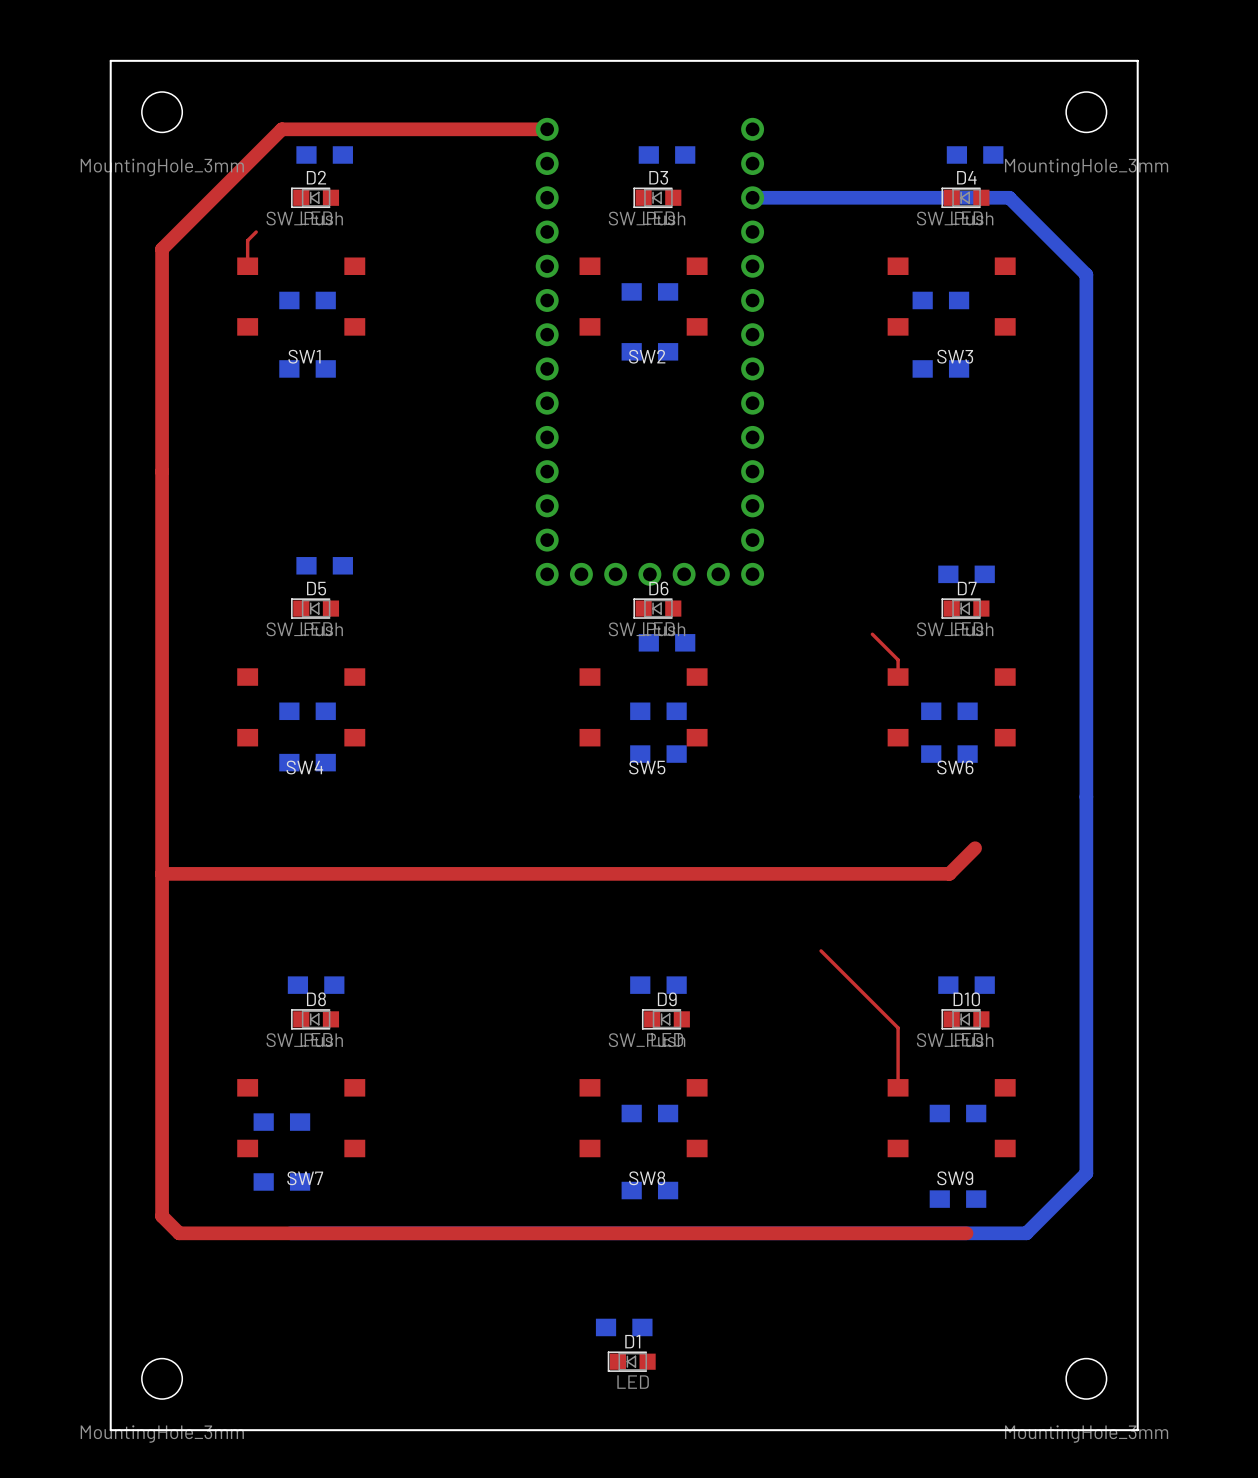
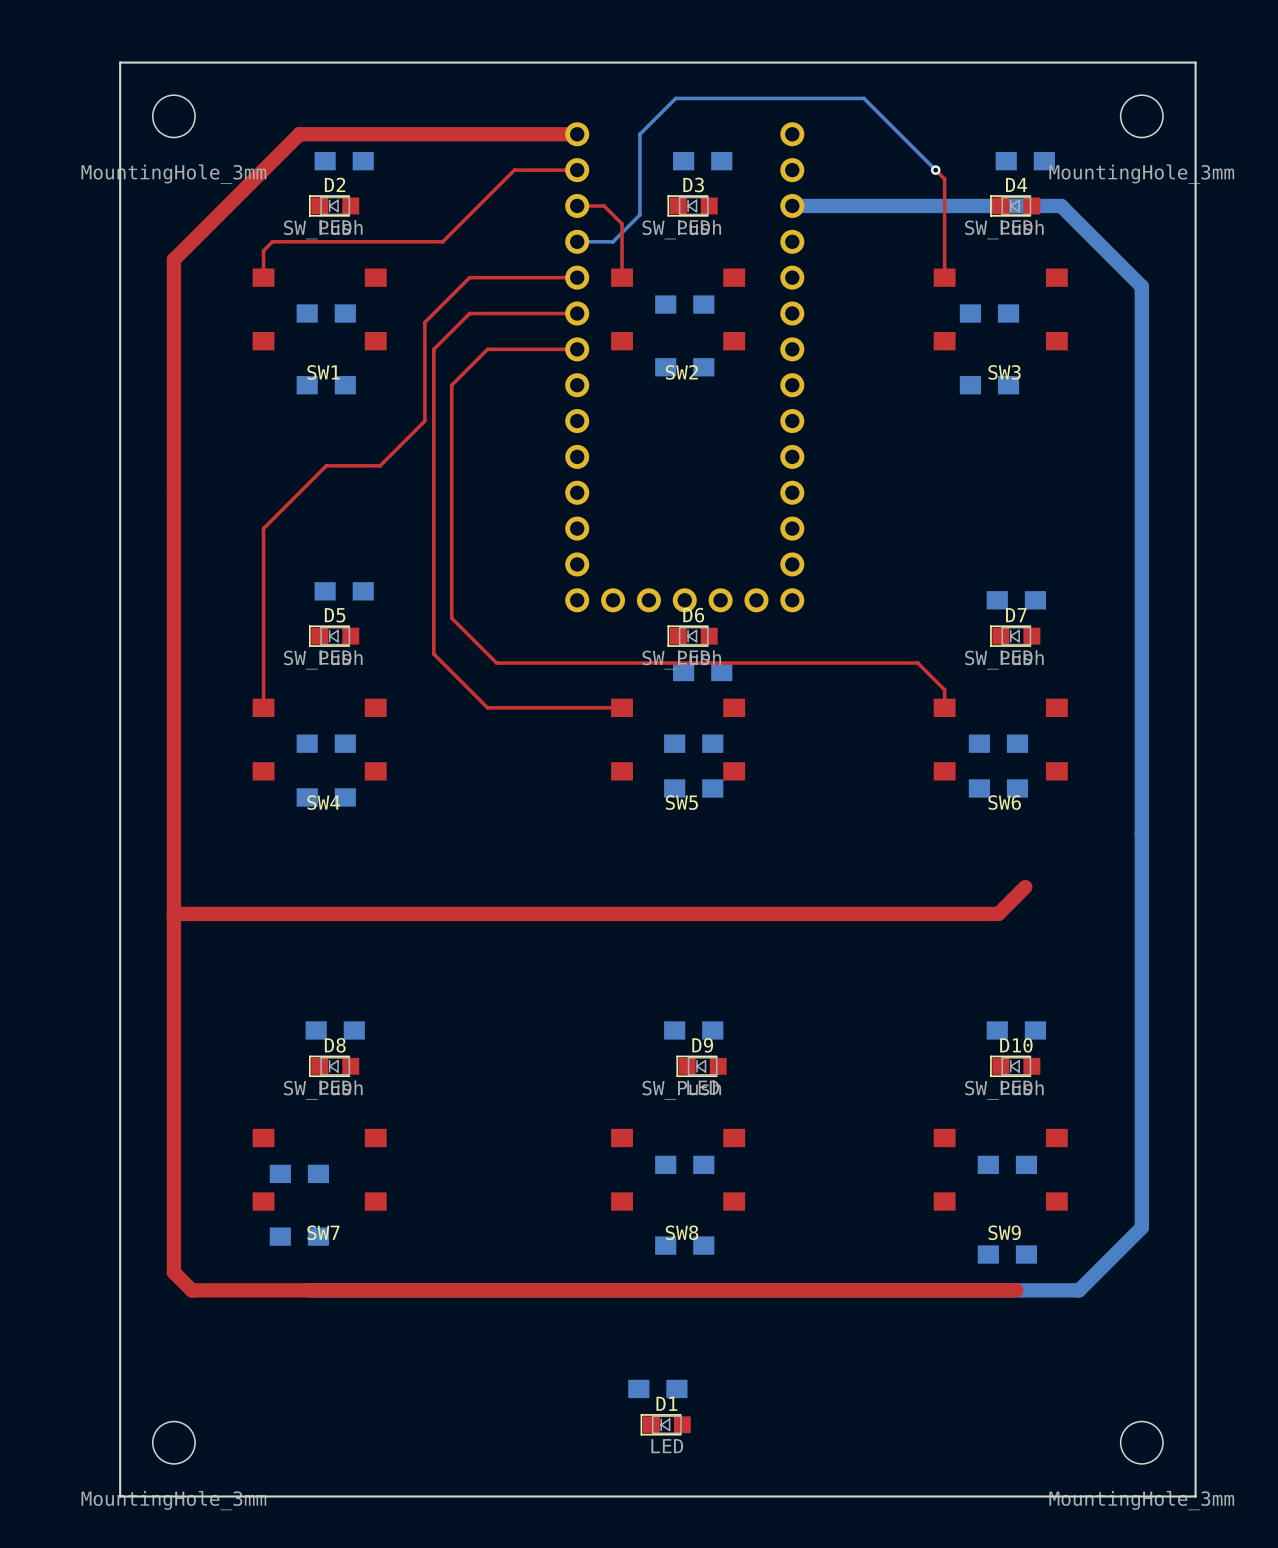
top track: none -> (577, 170) (514, 170) (442, 241) (272, 241)
bottom track: none -> (935, 170) (863, 98) (675, 98) (639, 134) (639, 214) (613, 241) (577, 241)
top track: none -> (935, 170) (944, 179) (944, 277)
via: none -> (935, 170)
top track: none -> (577, 205) (604, 205) (622, 223) (622, 277)
top track: none -> (577, 277) (469, 277) (424, 322) (424, 421) (380, 465) (326, 465) (263, 528) (263, 707)
top track: none -> (577, 313) (469, 313) (433, 349) (433, 654) (487, 707) (622, 707)
top track: none -> (577, 349) (487, 349) (451, 385) (451, 618) (496, 663) (917, 663)
top track: (821, 950) (898, 1027) (898, 1087) -> none

